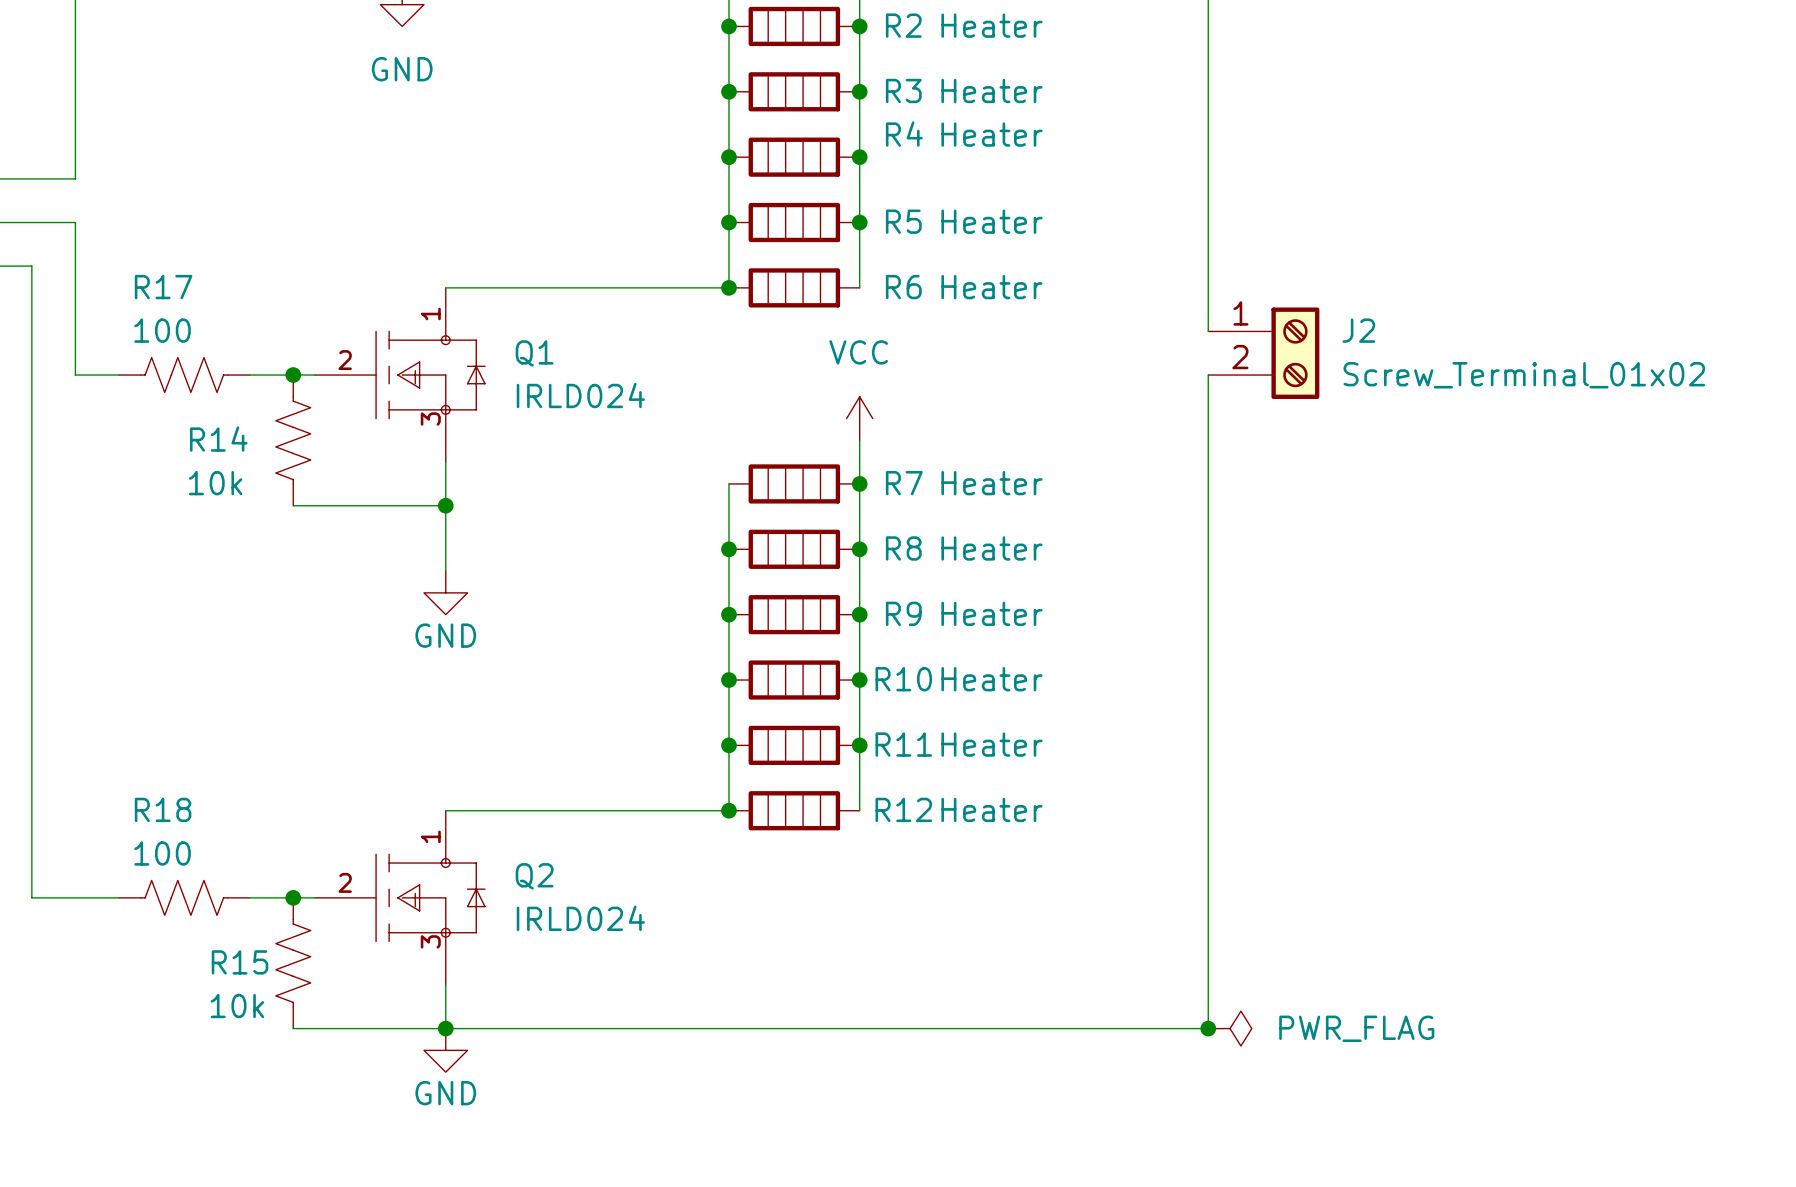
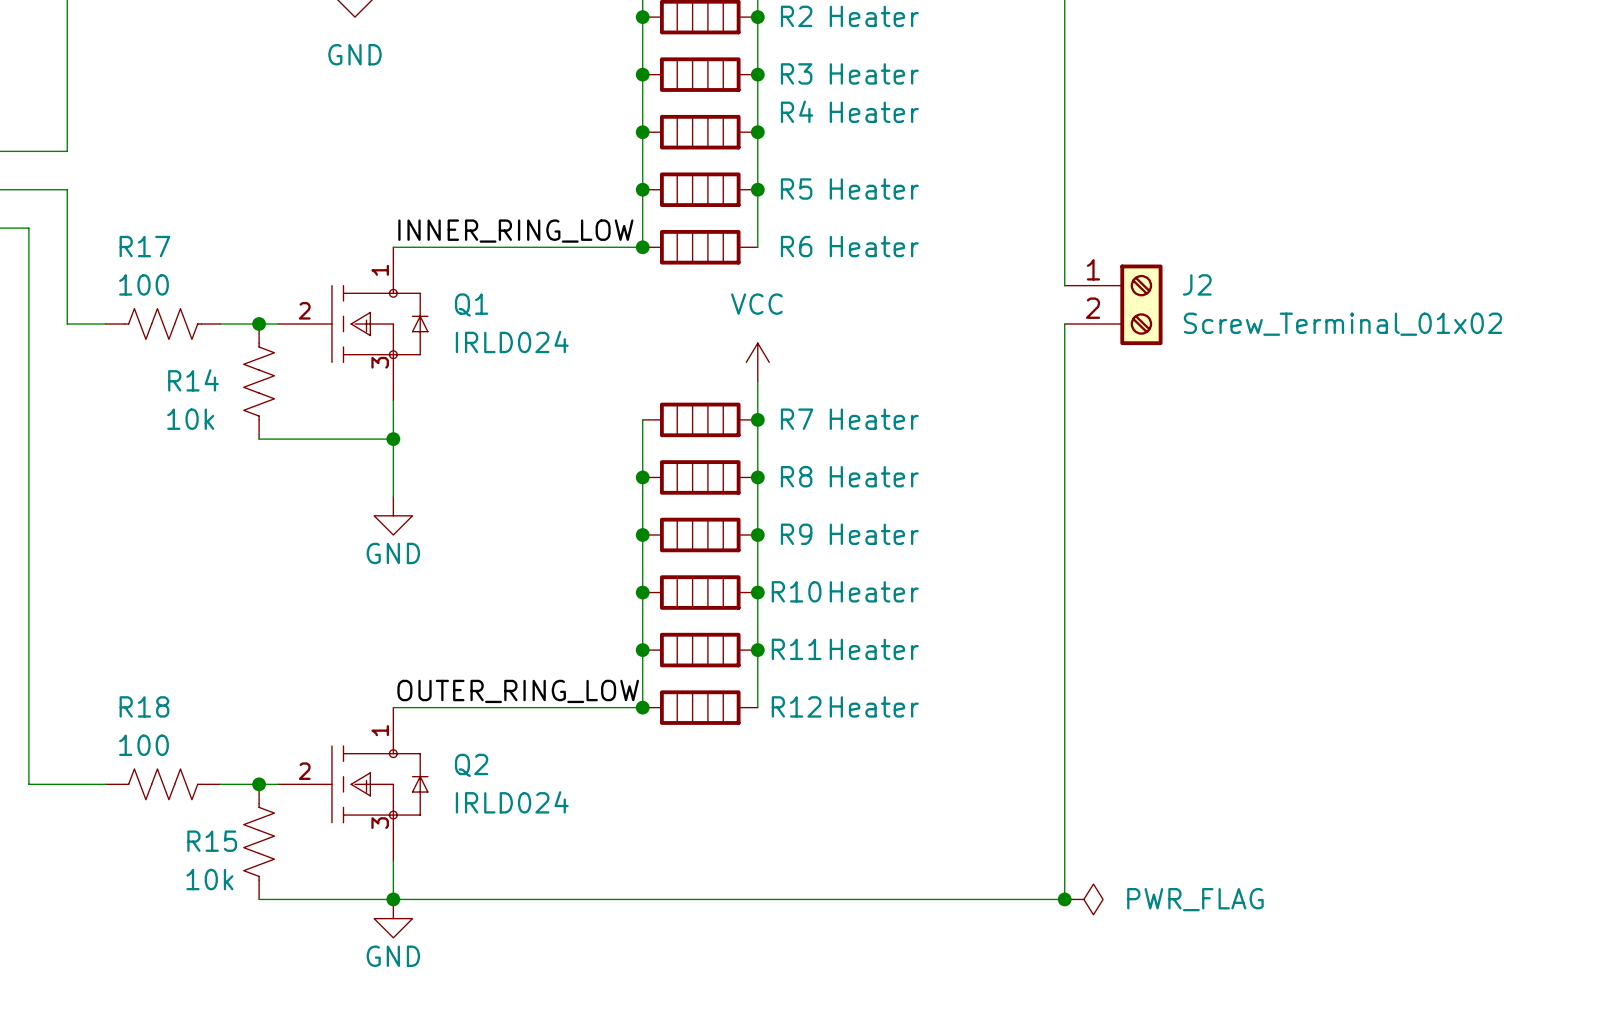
label: none -> INNER_RING_LOW (515, 231)
label: none -> OUTER_RING_LOW (518, 691)

